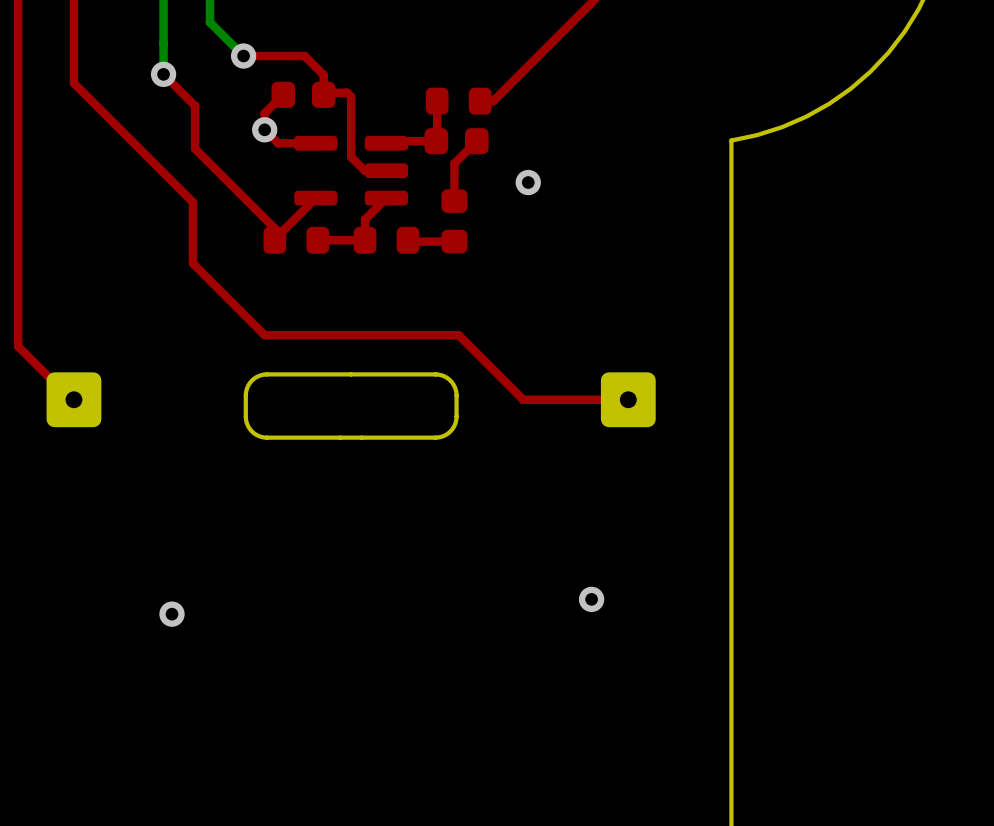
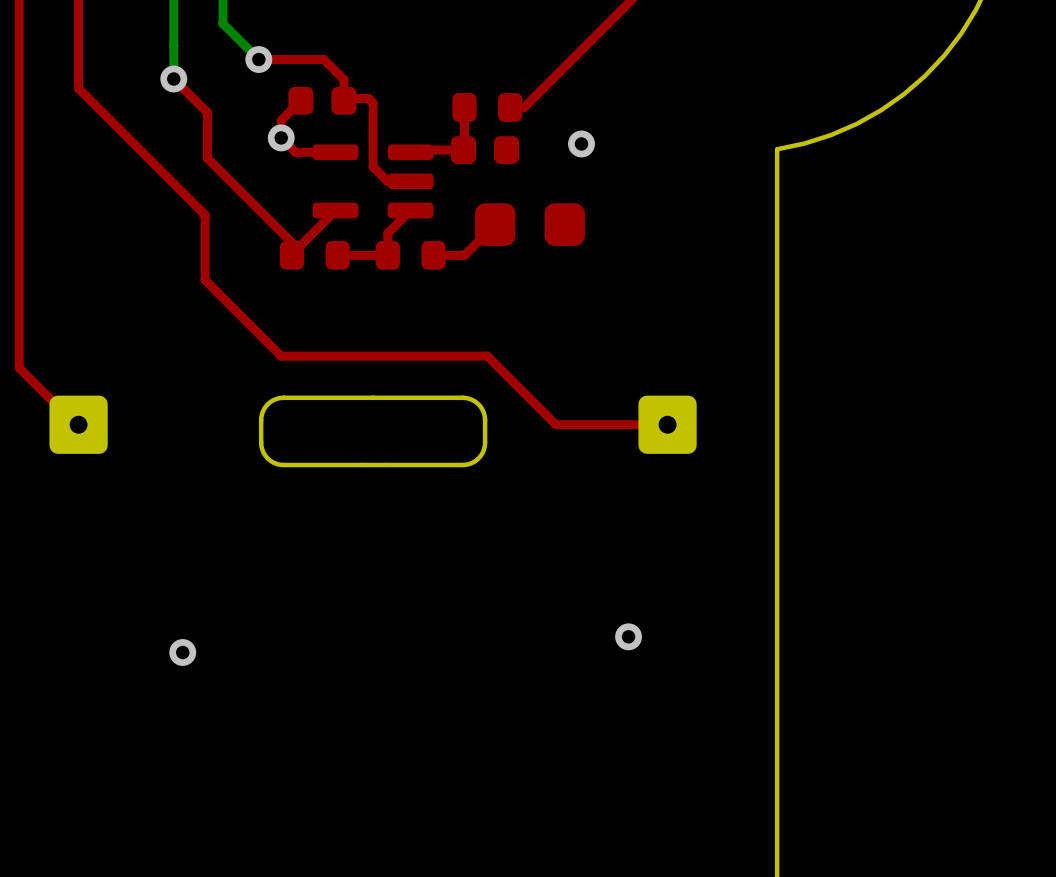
top track: (476, 141) (454, 163) (454, 201) -> none
via position: (528, 182) -> (581, 143)
top track: none -> (495, 224) (464, 255) (433, 255)
part: none -> (529, 224)
part: (454, 221) -> none
top track: (454, 241) (409, 241) -> none

